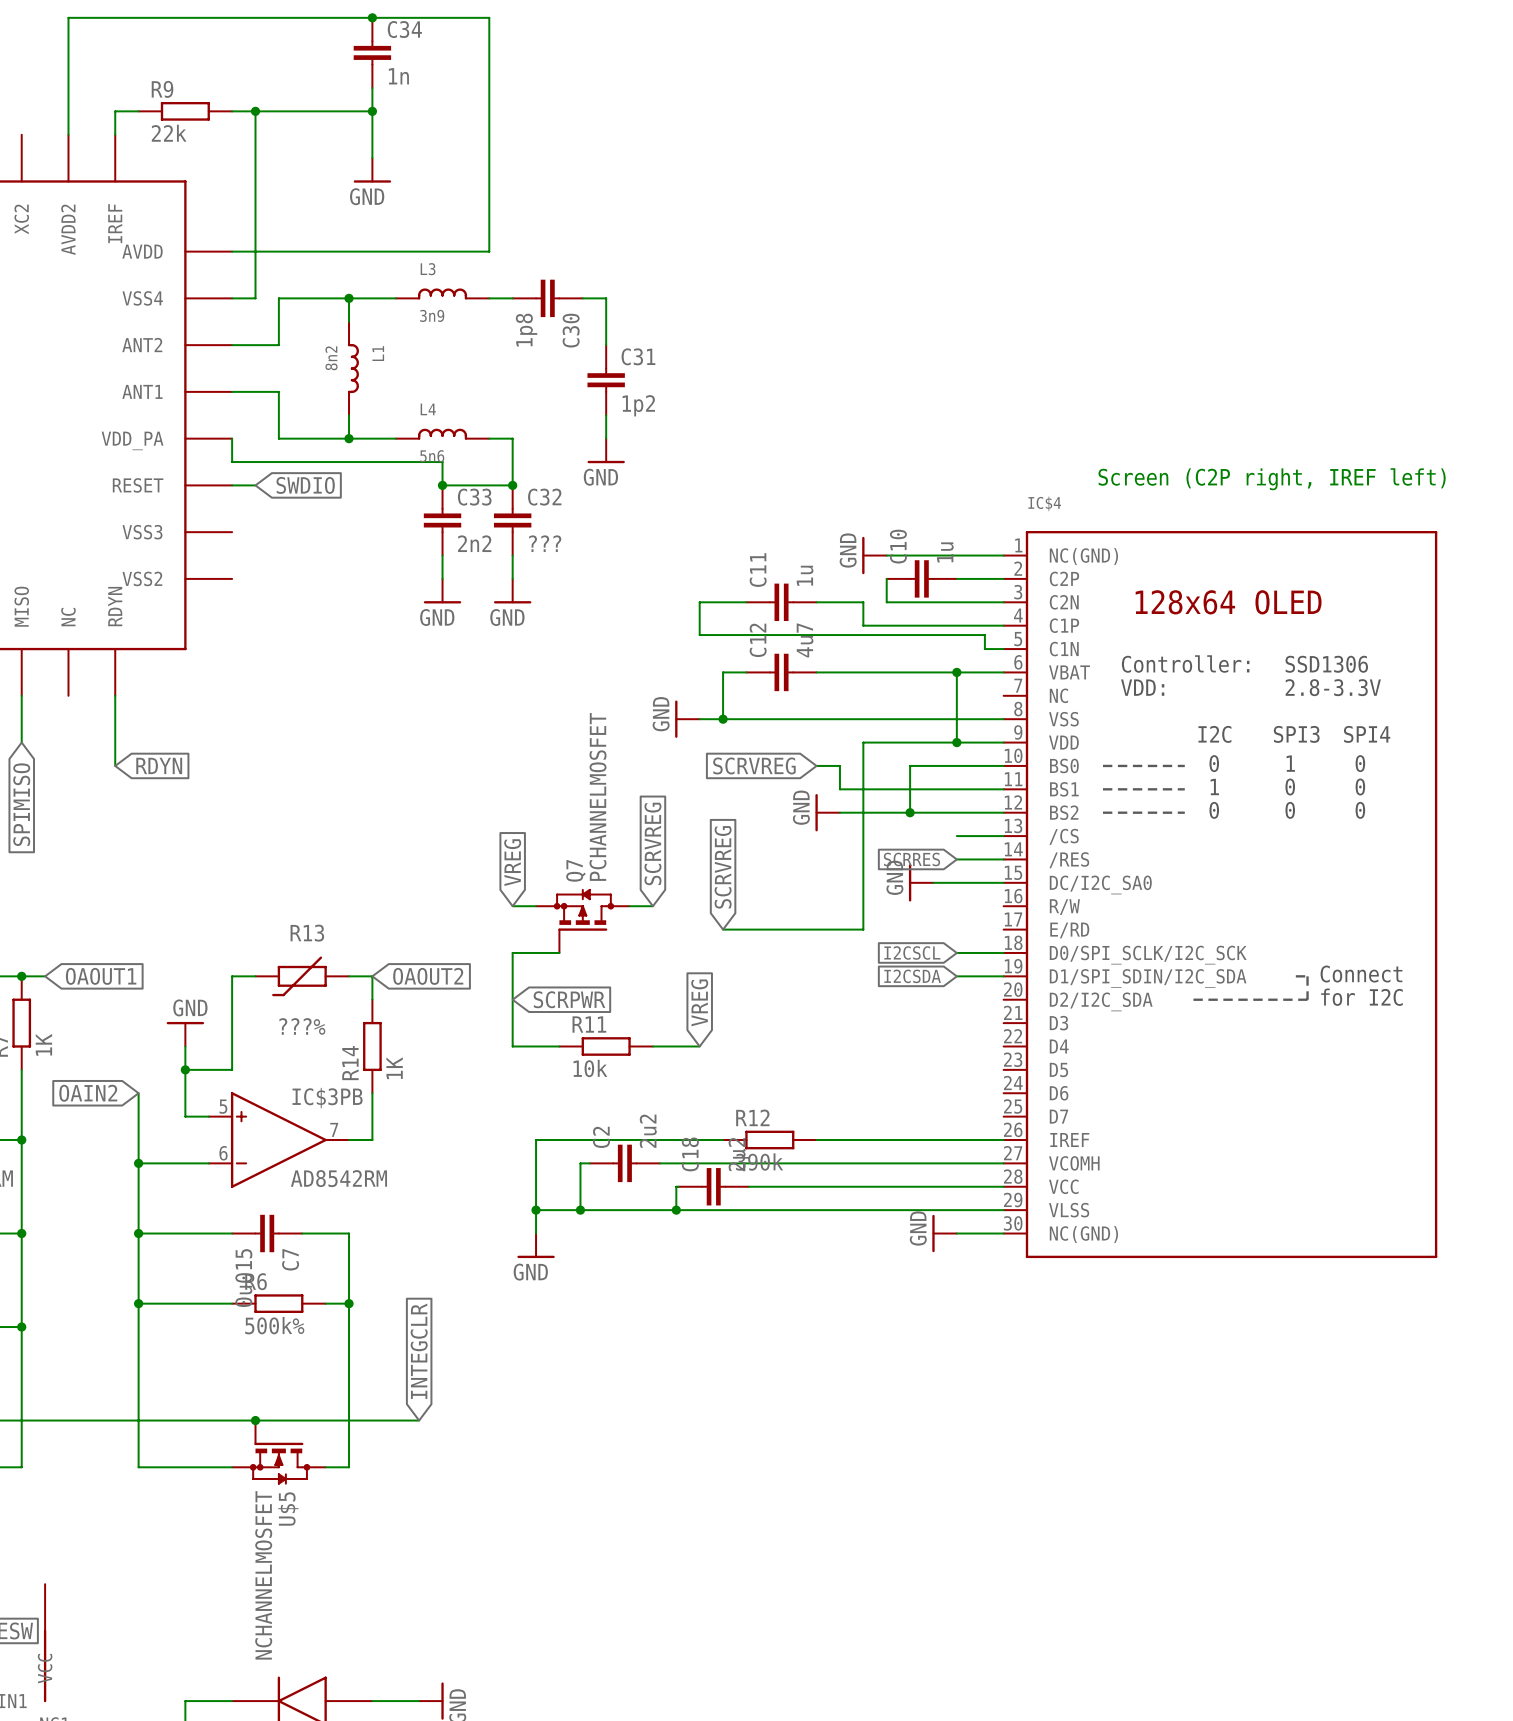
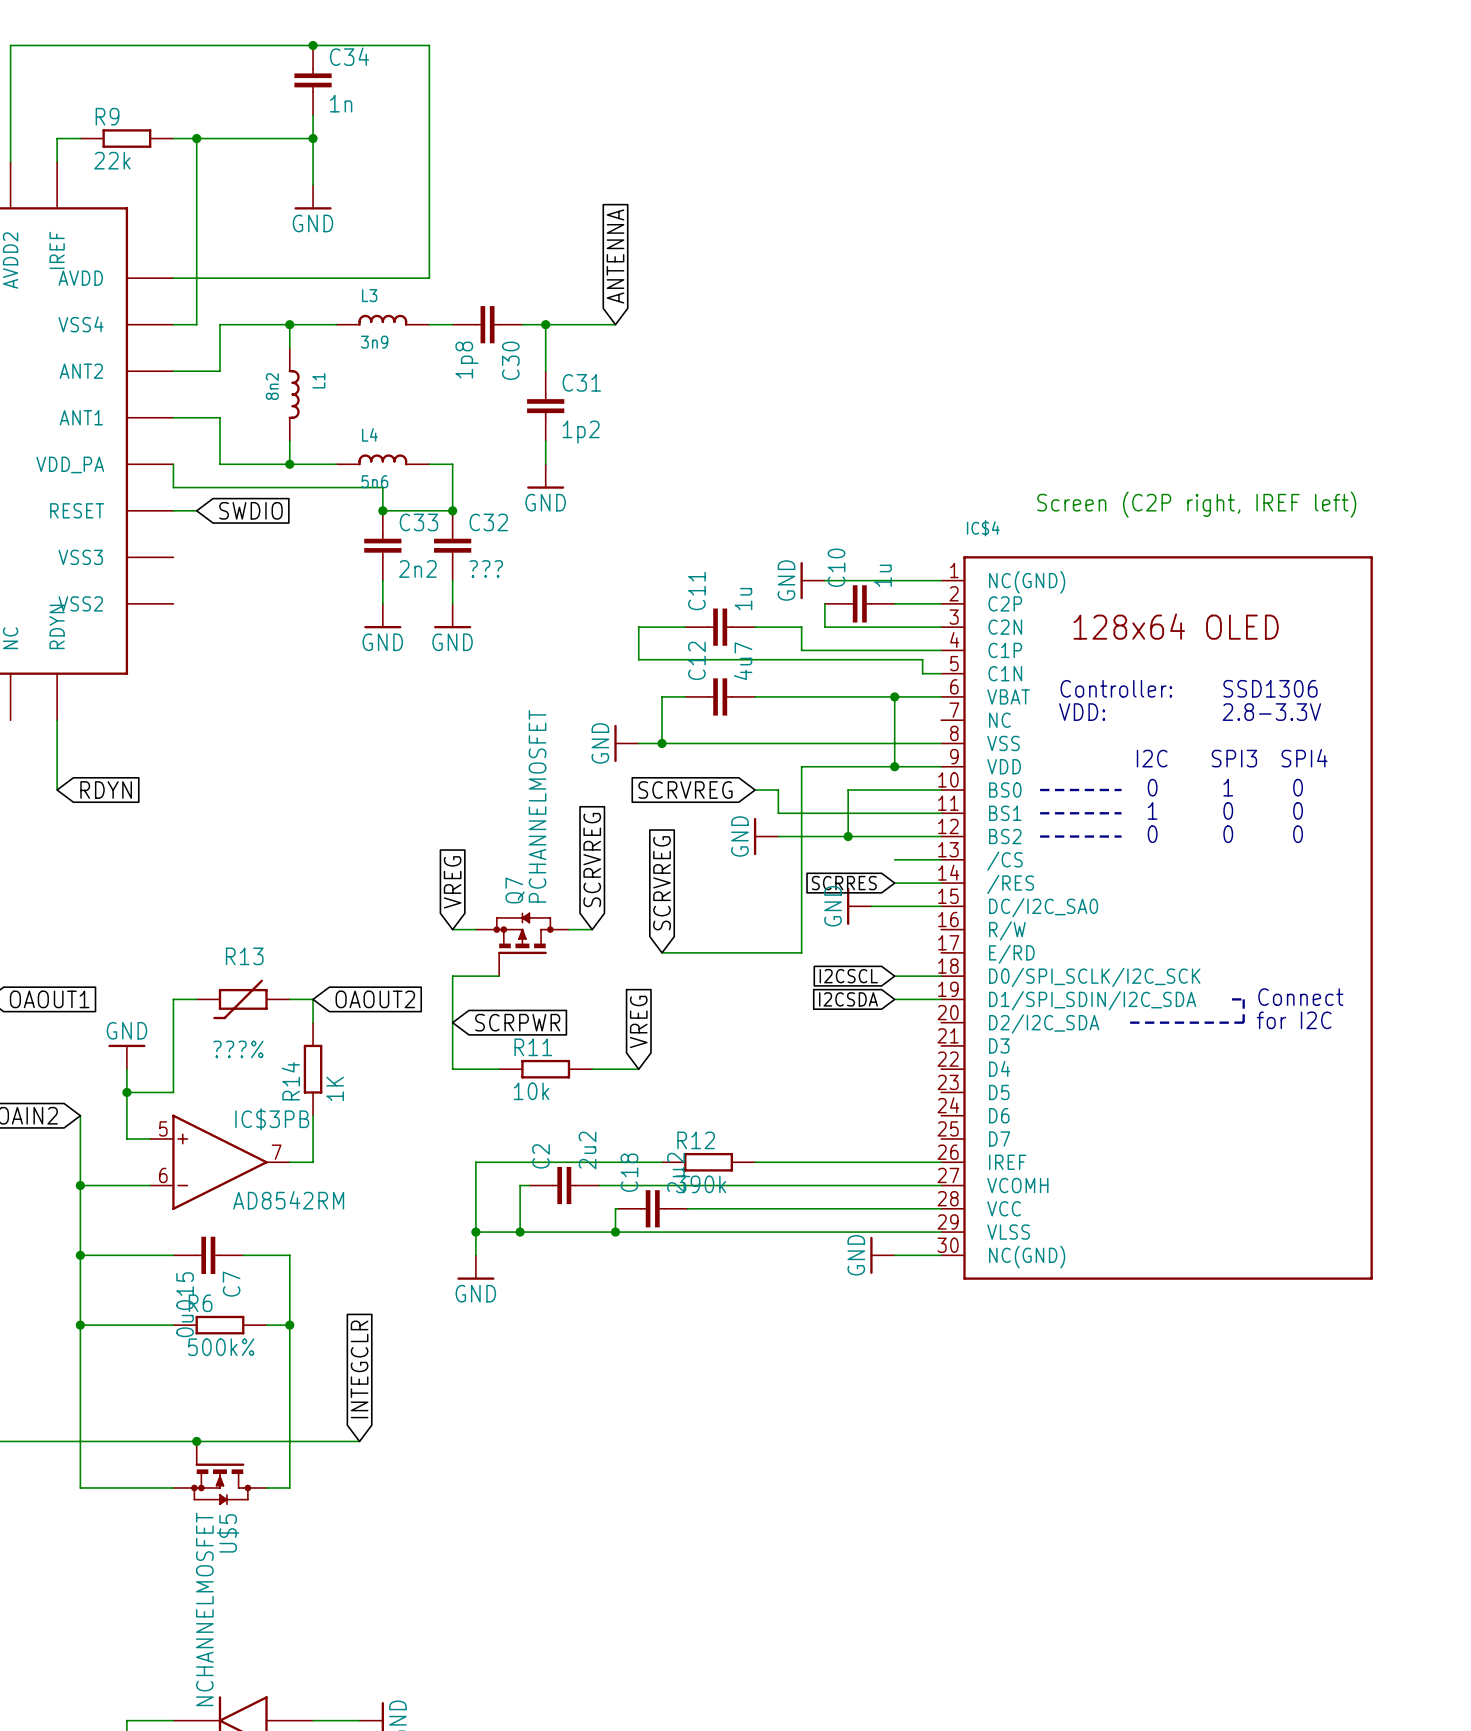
global label: none -> ANTENNA (615, 256)
wire: none -> (545, 324) (615, 324)
junction: none -> (545, 324)

